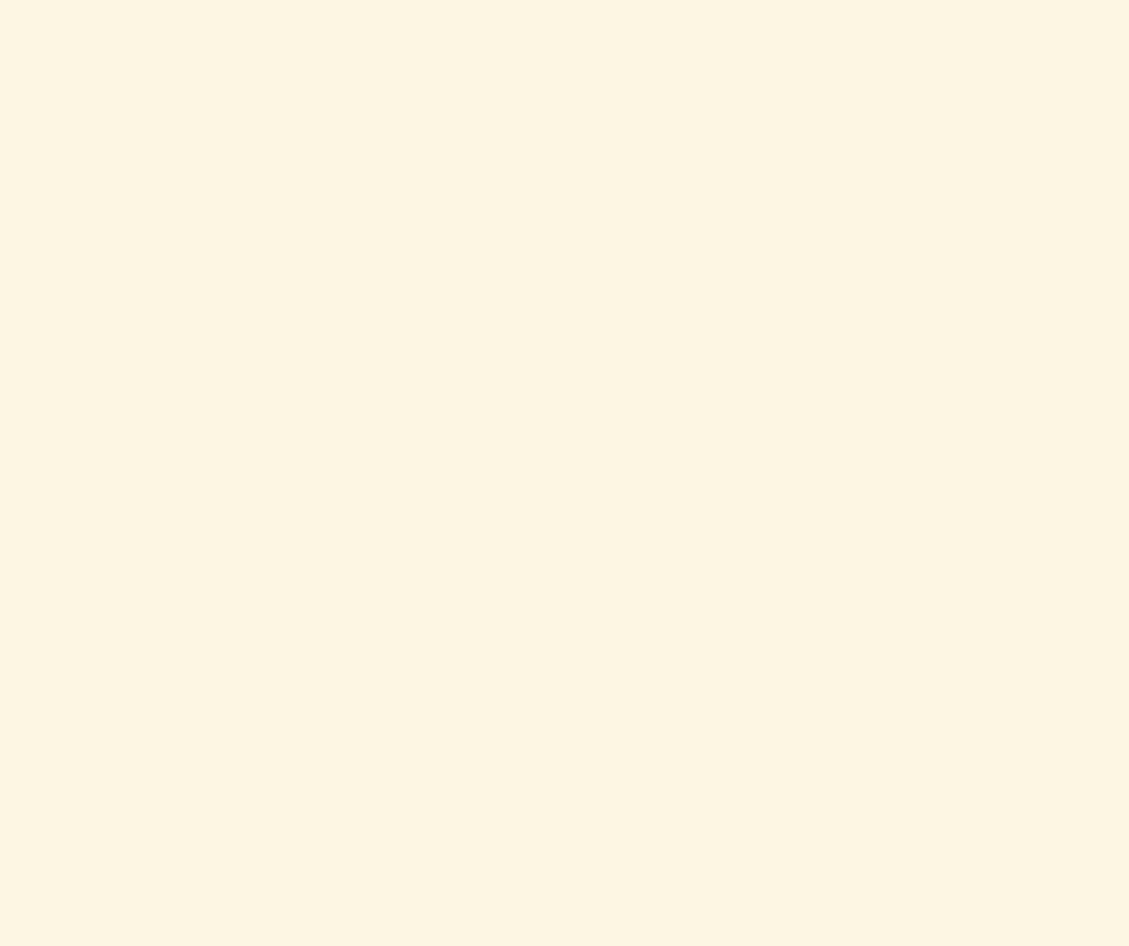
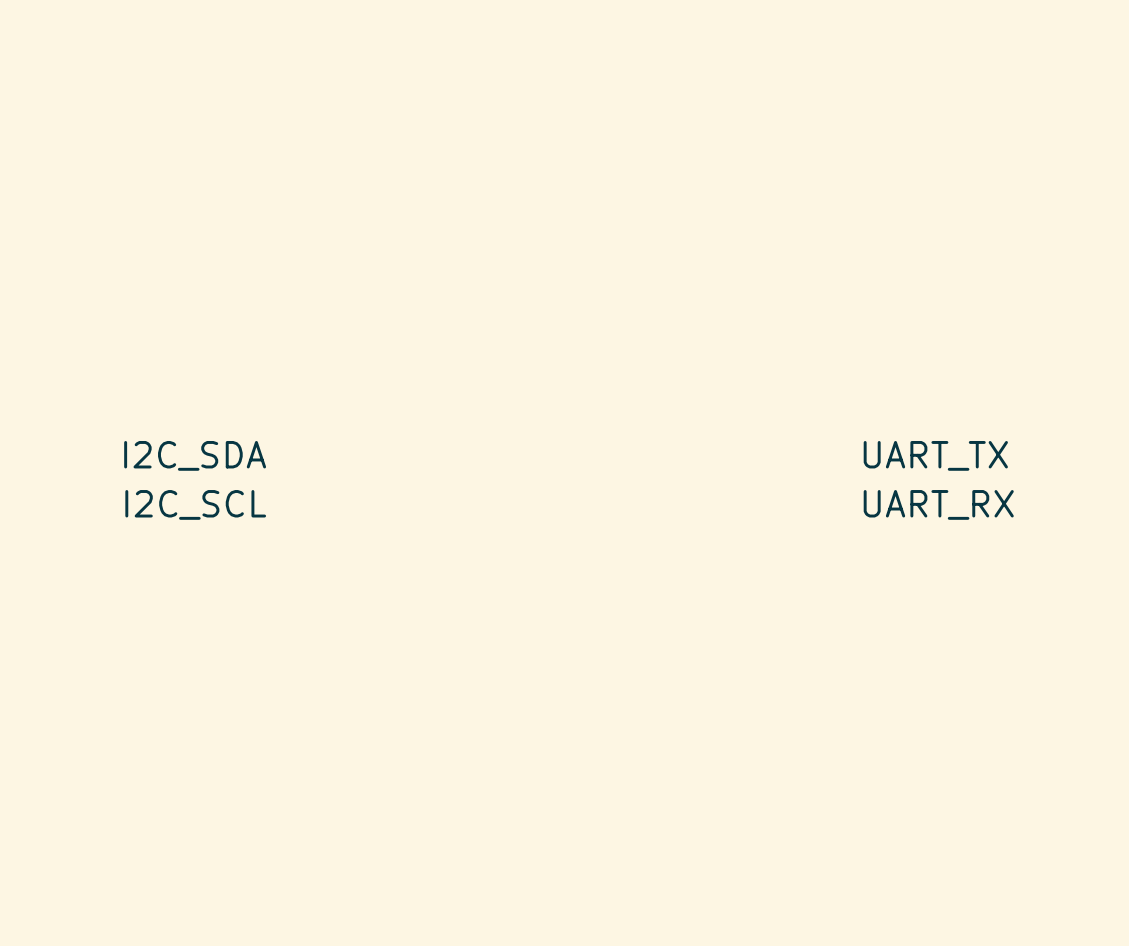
label: none -> I2C_SDA (195, 455)
label: none -> UART_TX (935, 455)
label: none -> I2C_SCL (195, 504)
label: none -> UART_RX (938, 504)

